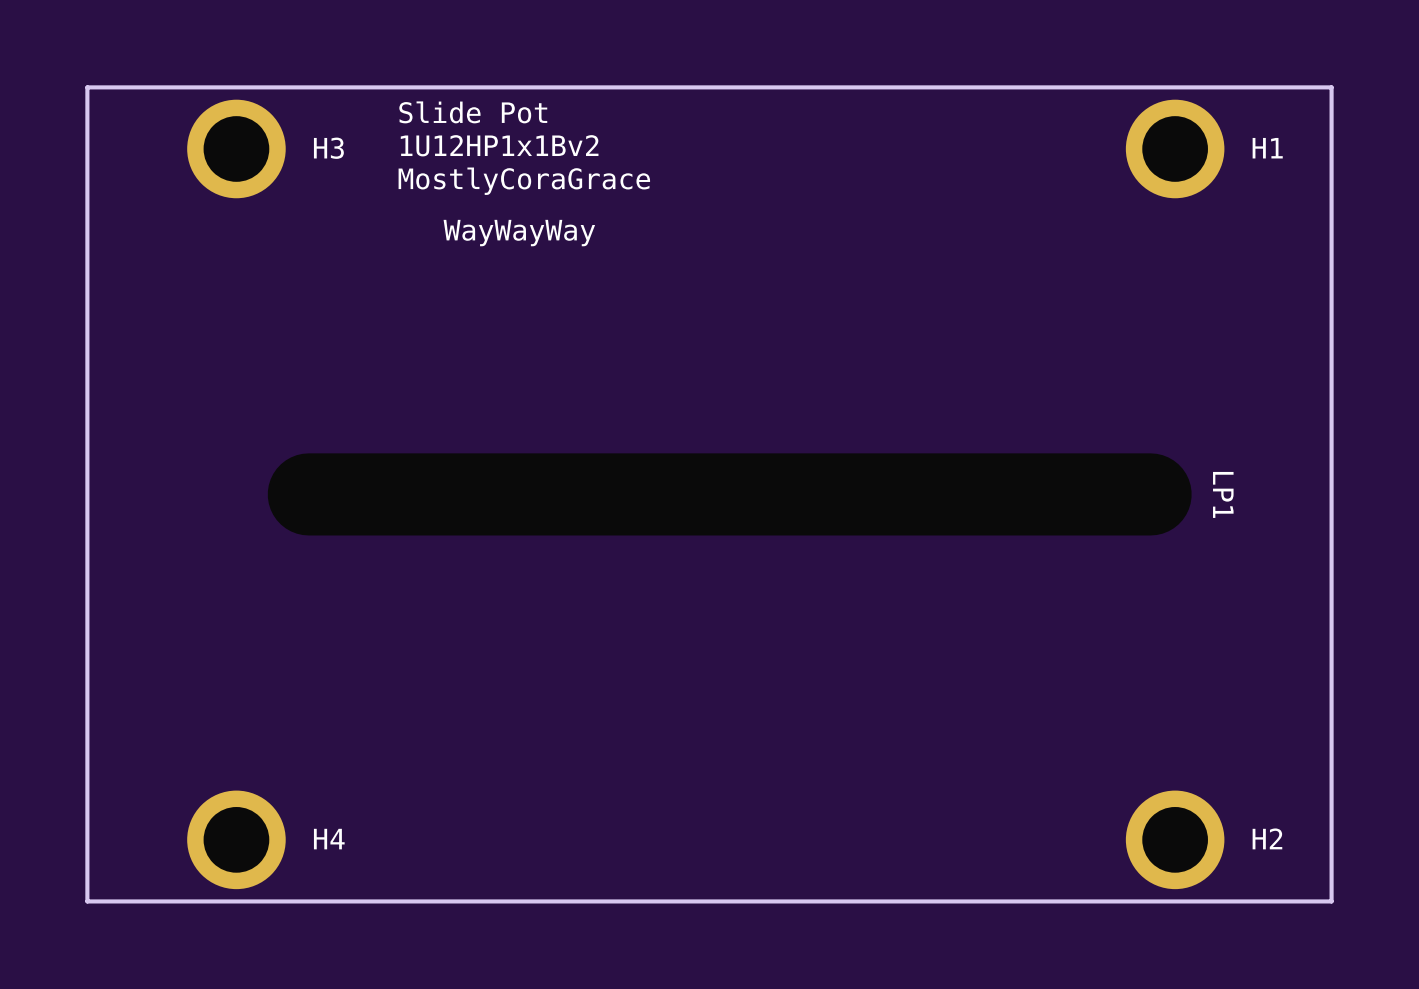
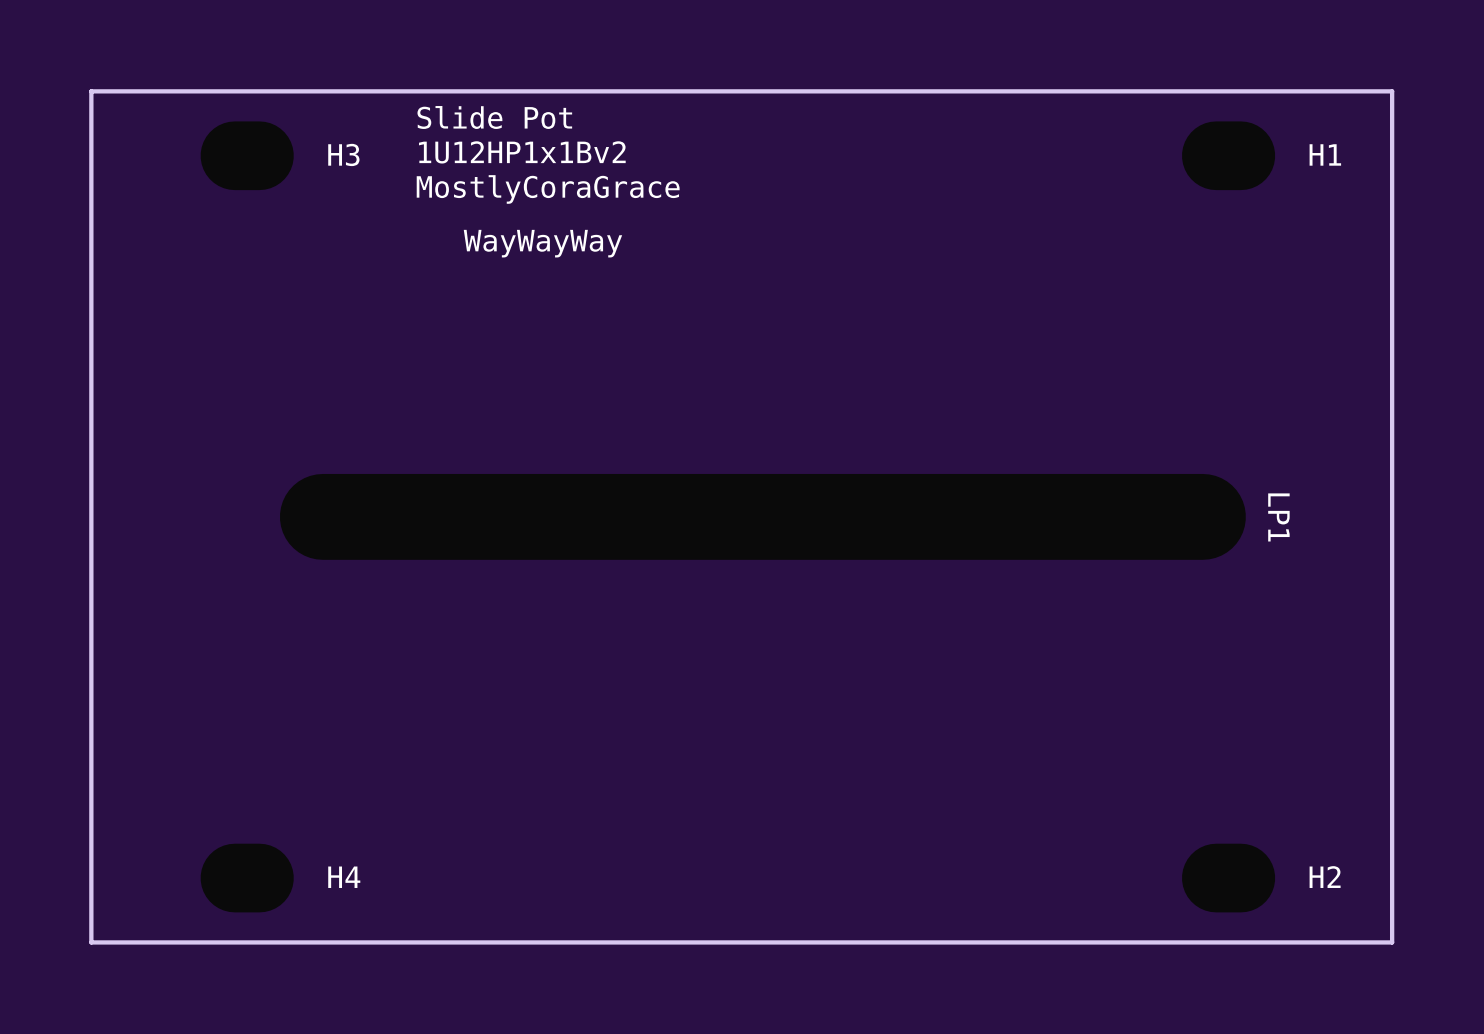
H3 footprint: [187, 99, 286, 199] -> [200, 121, 294, 191]
H1 footprint: [1125, 99, 1225, 199] -> [1181, 121, 1276, 191]
H4 footprint: [187, 790, 286, 890] -> [200, 843, 294, 913]
H2 footprint: [1125, 790, 1225, 890] -> [1181, 843, 1276, 913]

